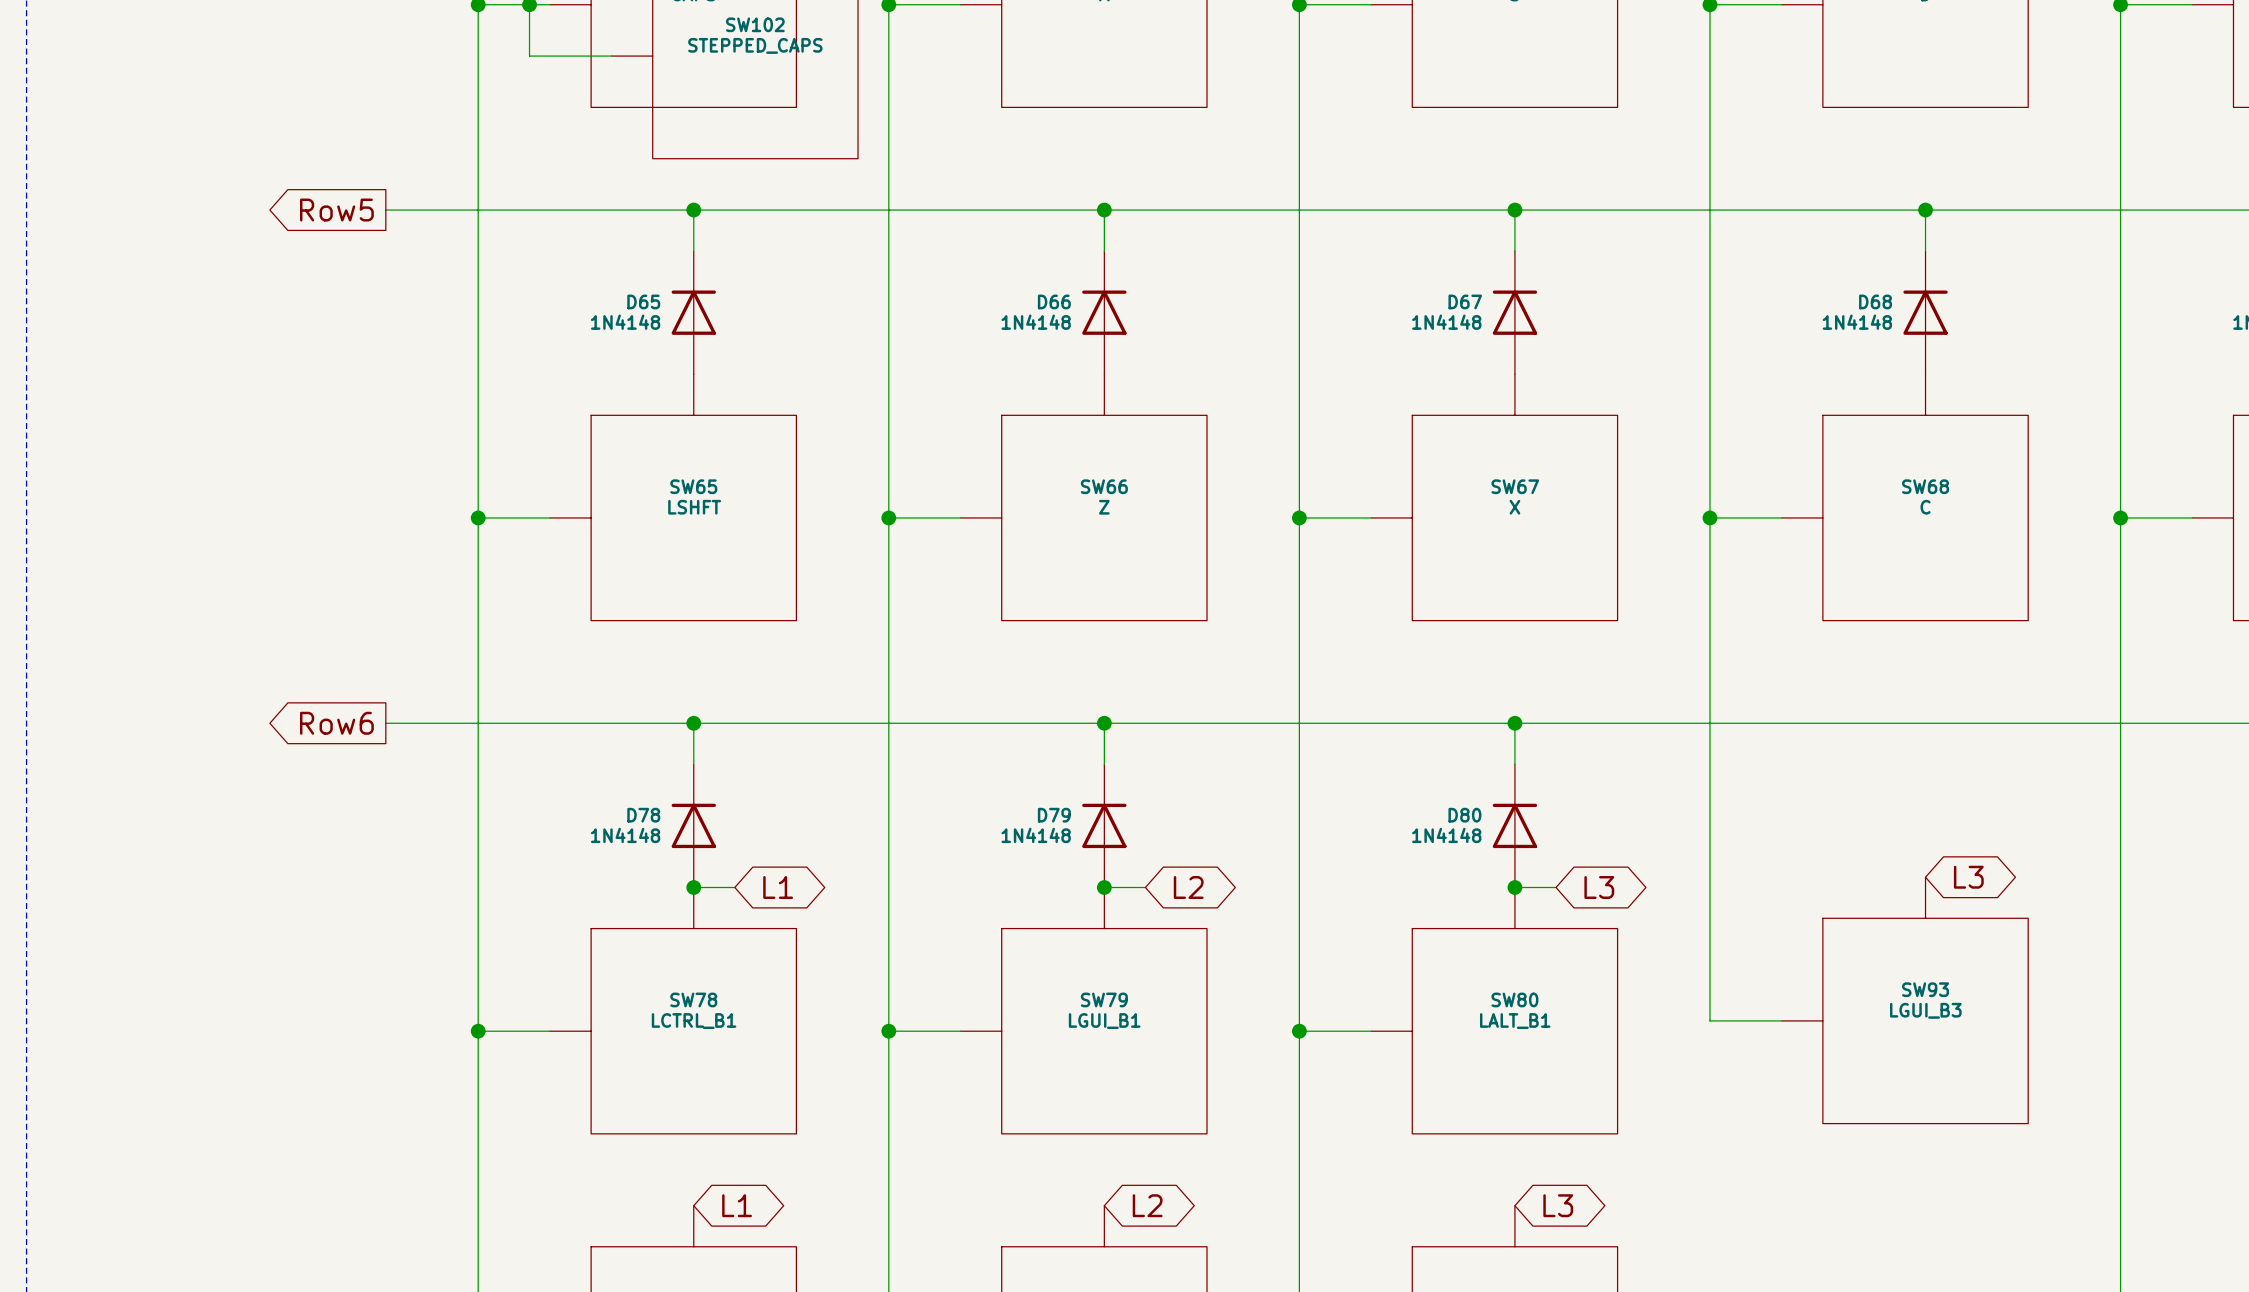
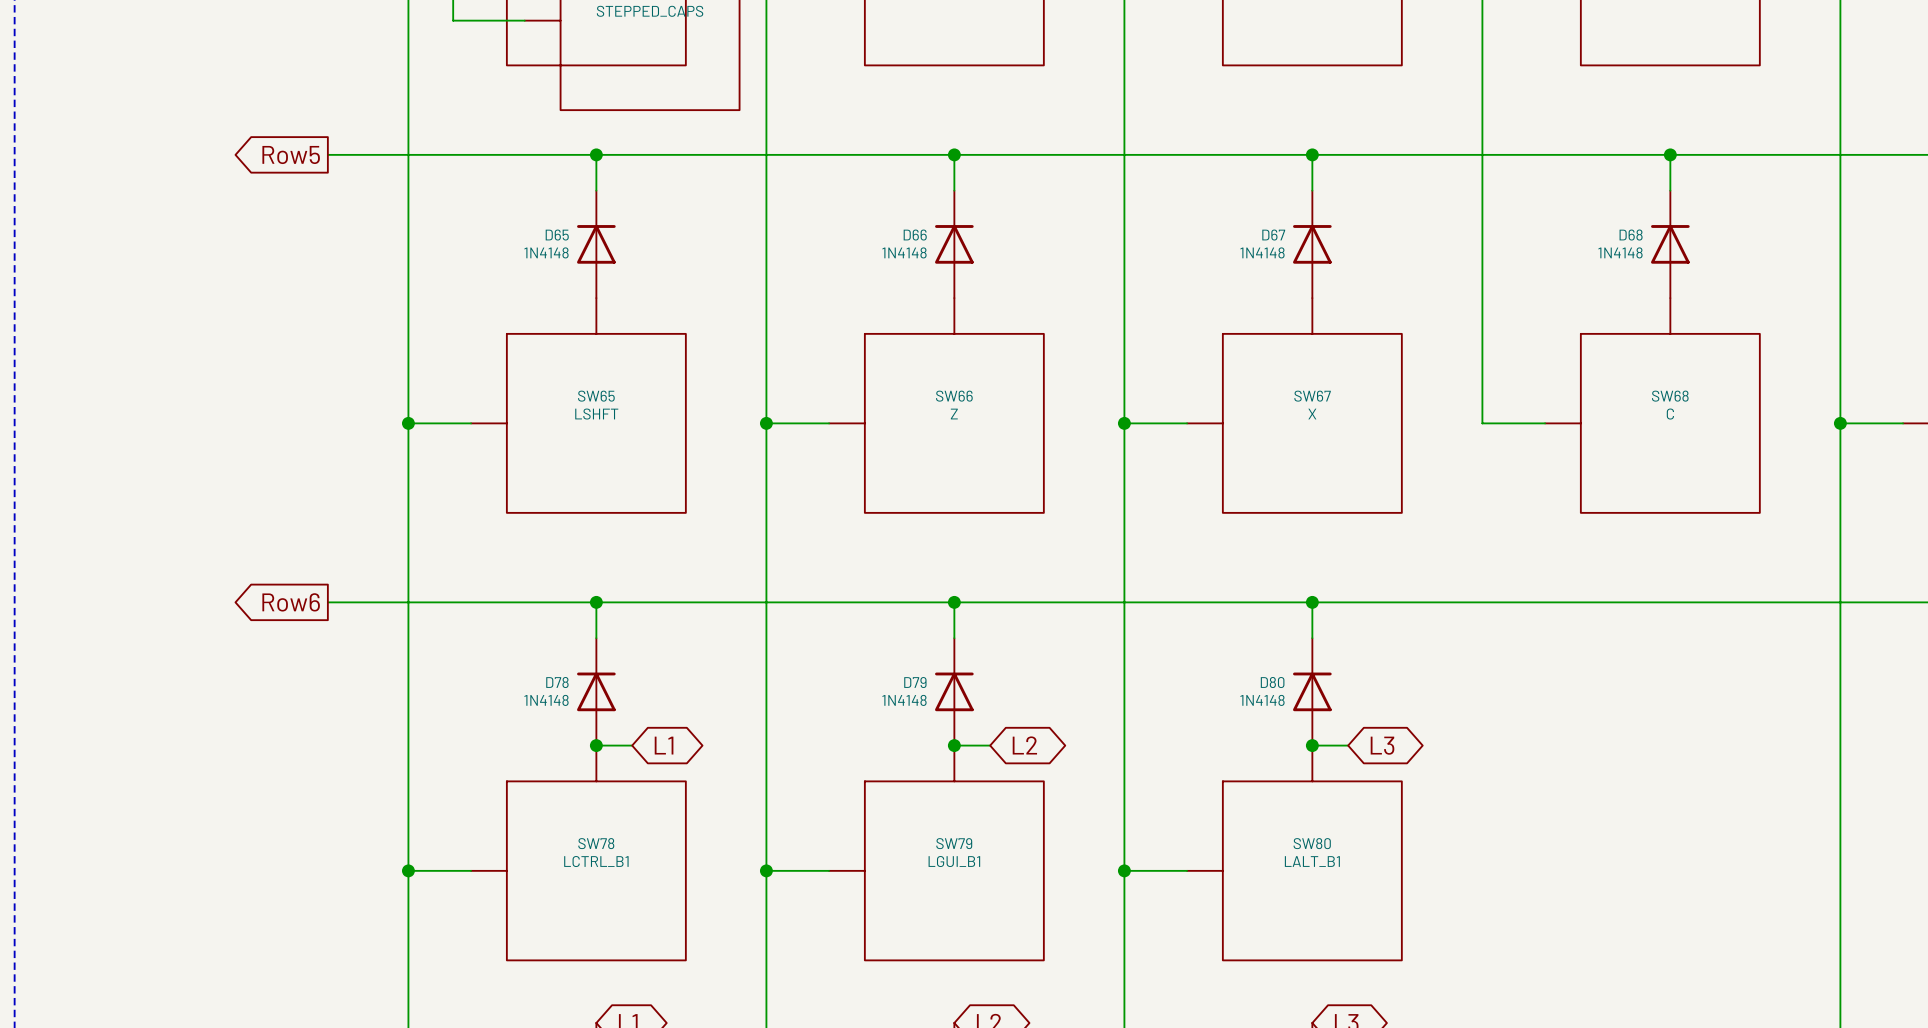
wire: (1709, 517) (1709, 1020) (1781, 1020) -> none
junction: (1709, 517) -> none
global label: L3 (1968, 877) -> none
SW93: LGUI_B3 (1905, 1000) -> none

